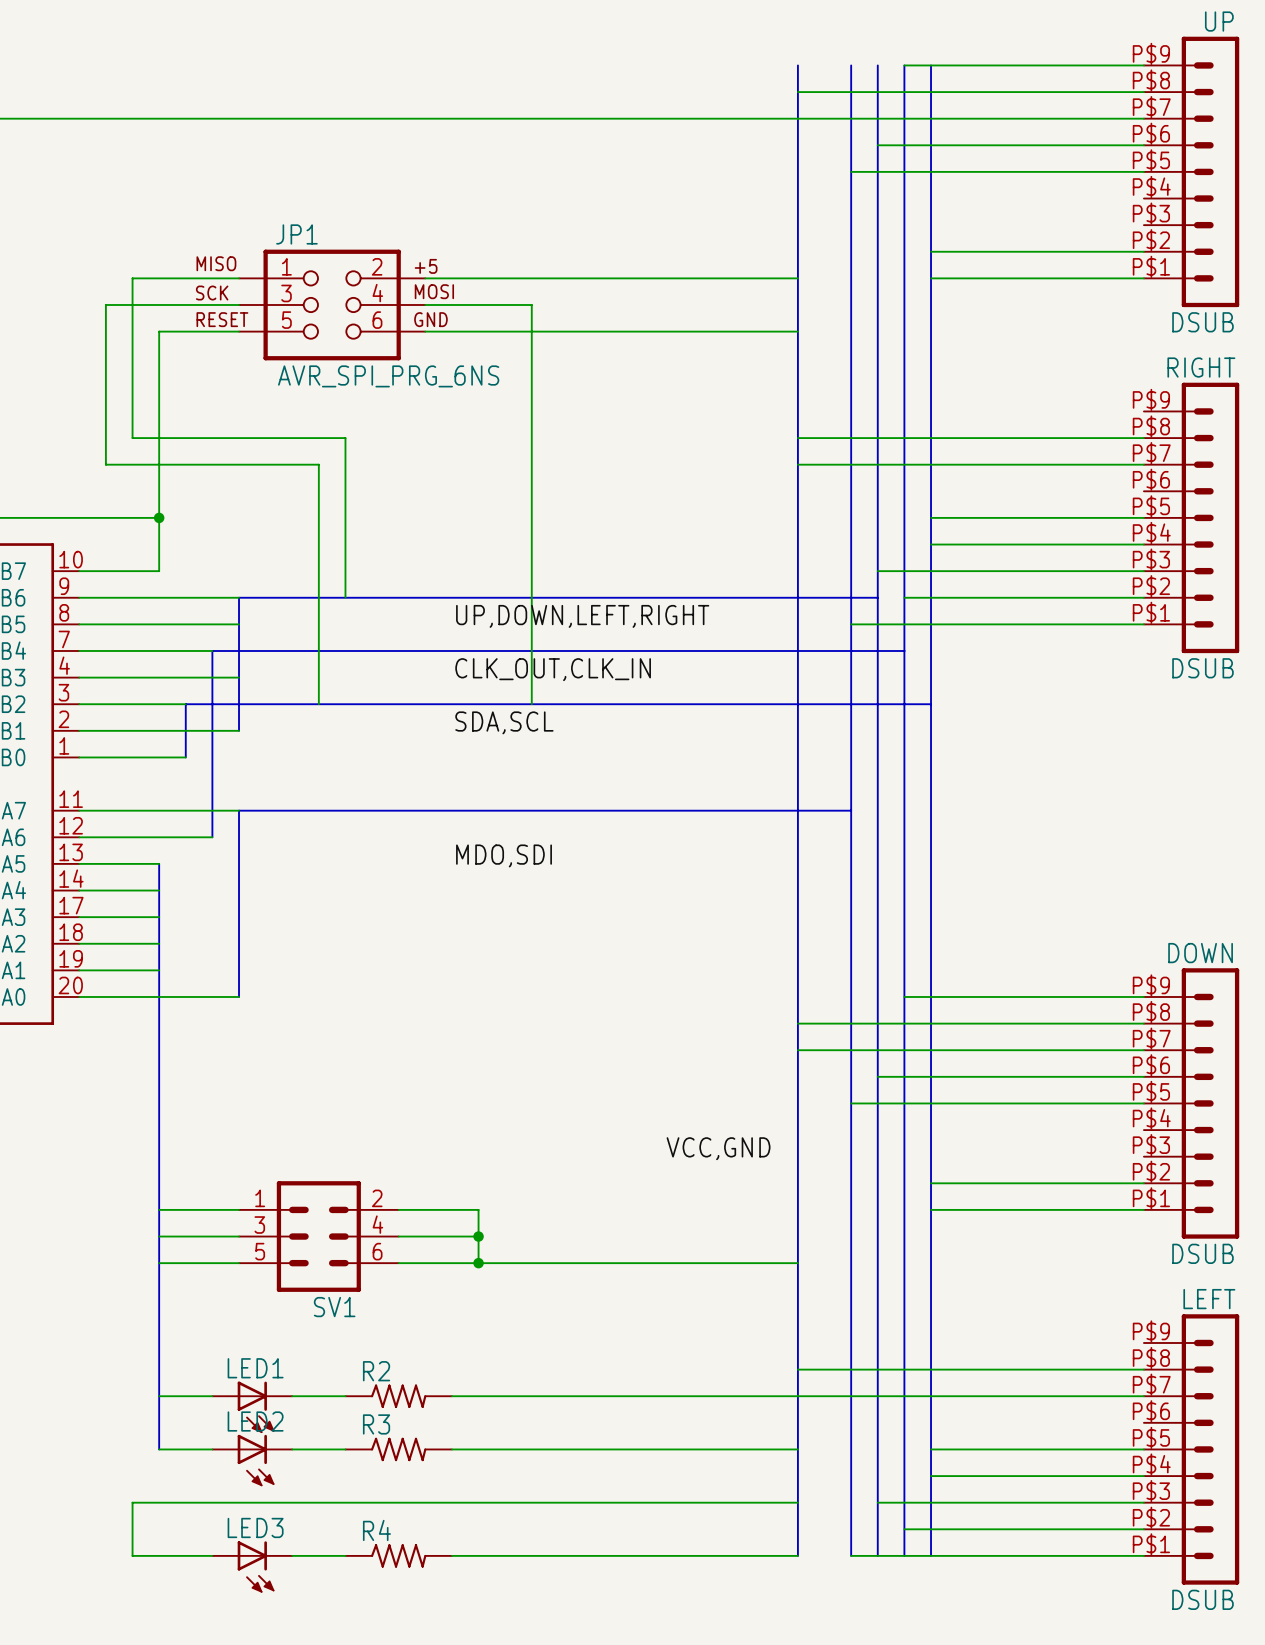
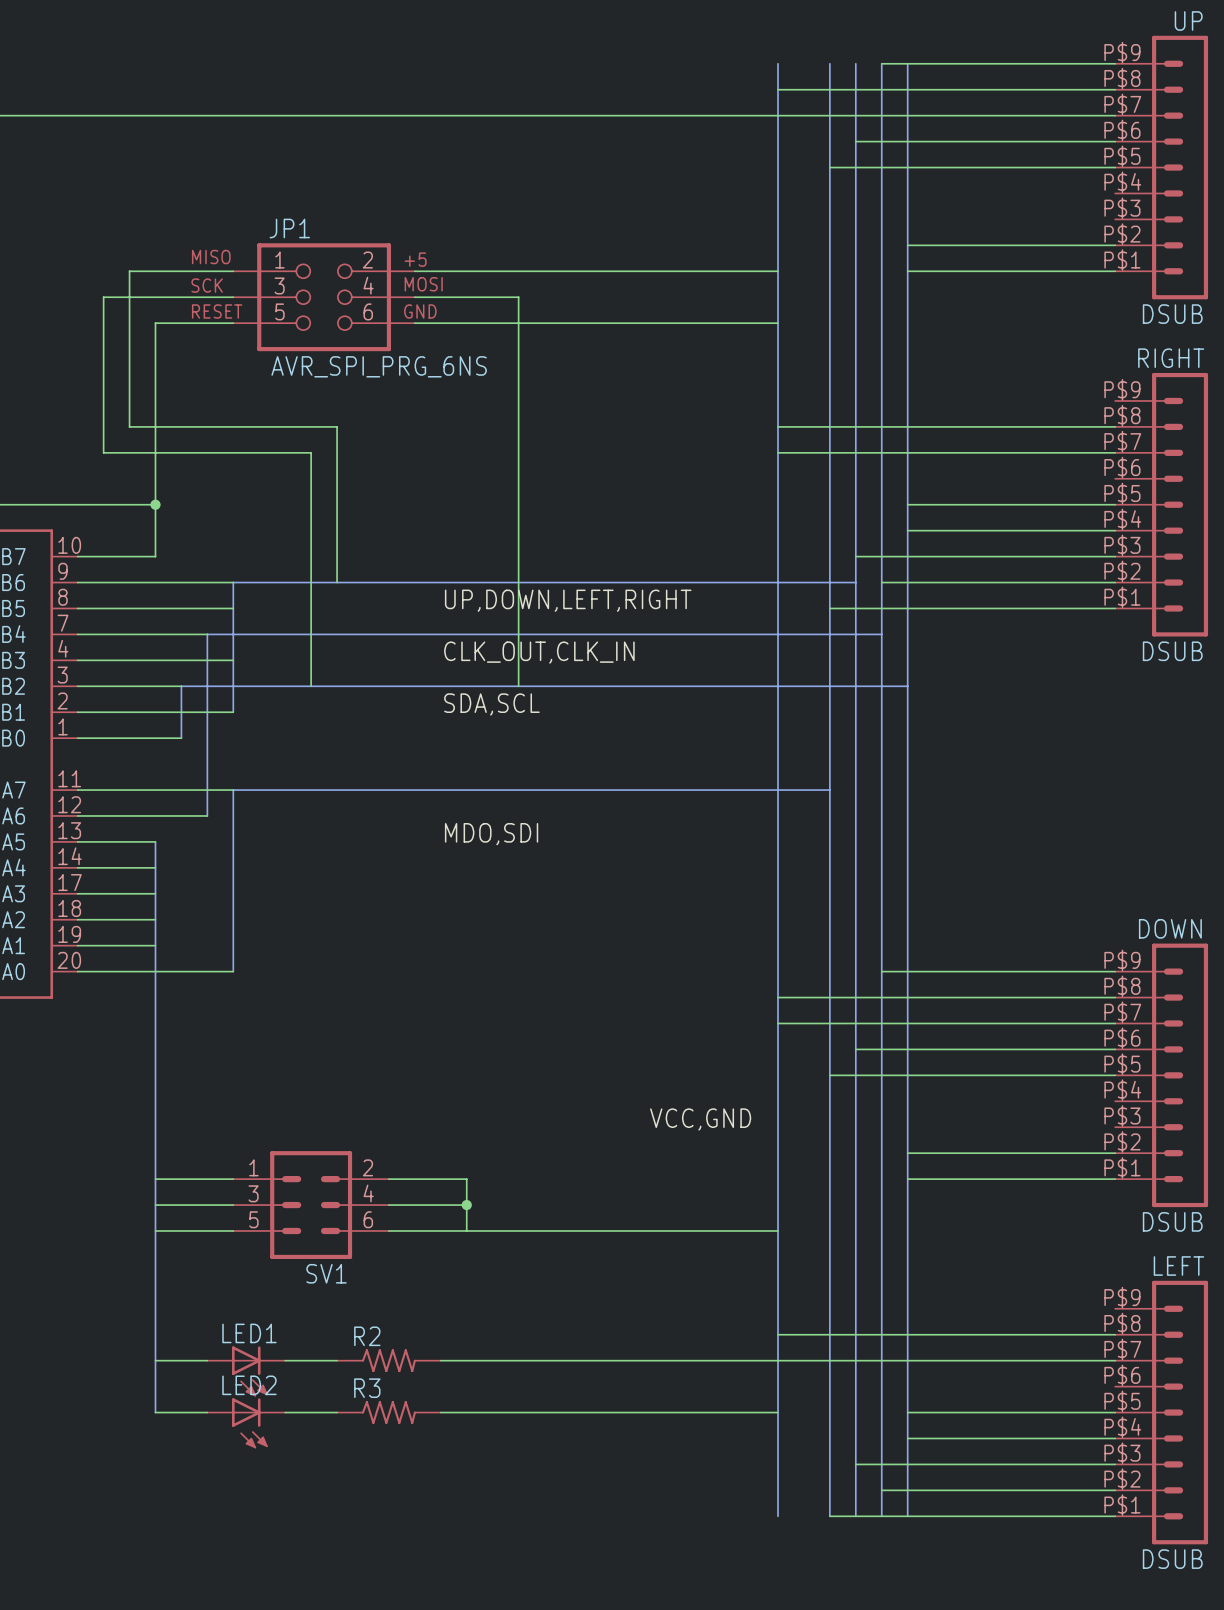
junction: (478, 1263) -> none
wire: (797, 1502) (132, 1502) (132, 1555) (212, 1555) -> none
wire: (292, 1555) (345, 1555) -> none
R4: (398, 1555) -> none
wire: (451, 1555) (797, 1555) -> none
LED3: (252, 1566) -> none

